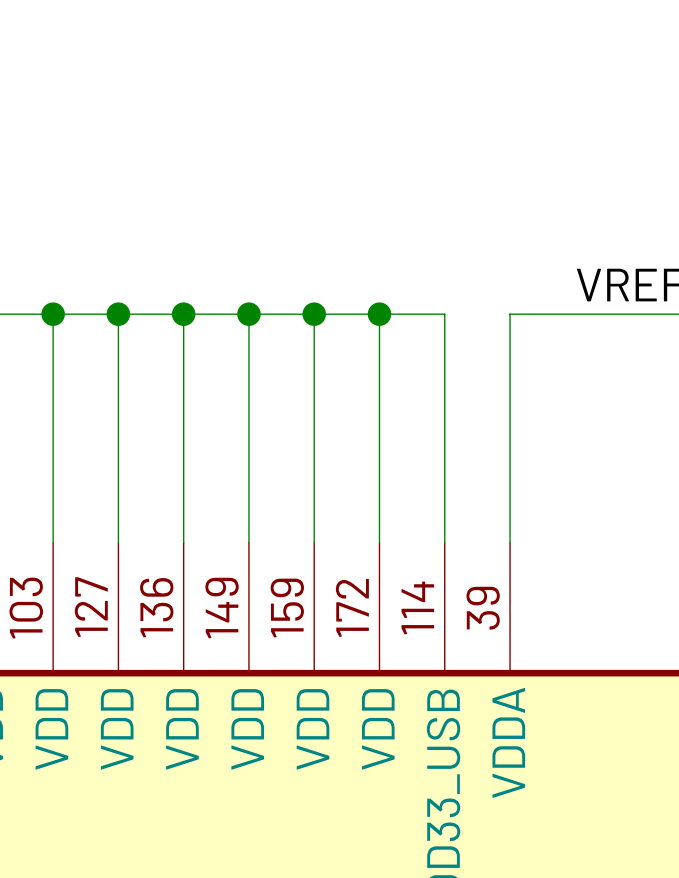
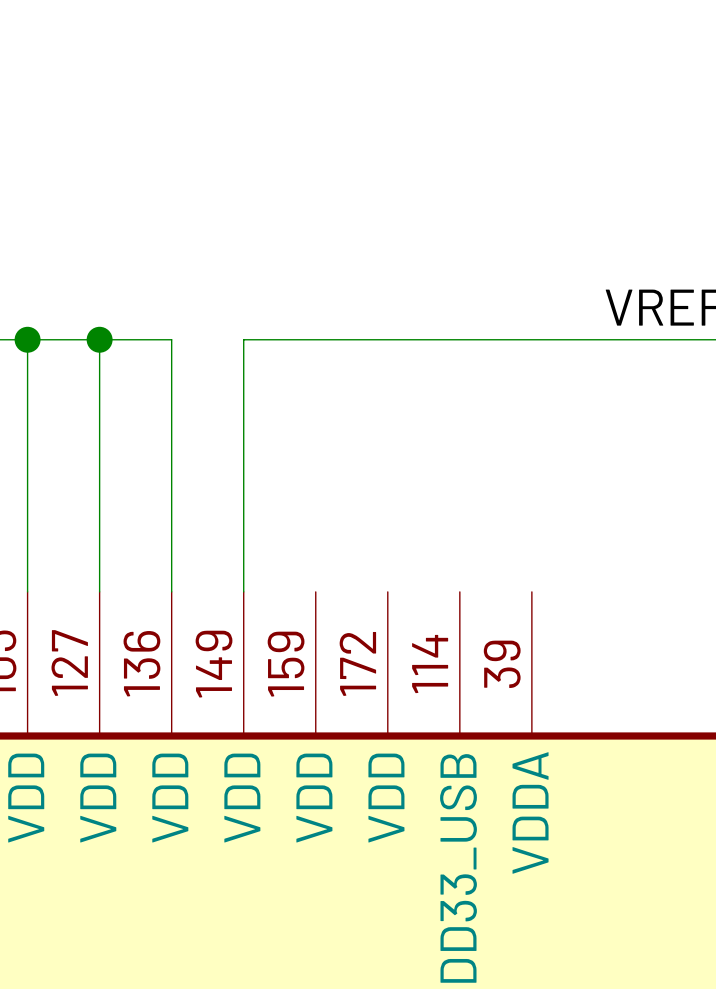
wire: (183, 314) (248, 314) -> none
junction: (183, 314) -> none
junction: (248, 314) -> none
wire: (314, 314) (314, 542) -> none
junction: (314, 314) -> none
wire: (379, 314) (379, 542) -> none
junction: (379, 314) -> none
wire: (444, 314) (444, 542) -> (459, 339) (531, 339)
wire: (510, 314) (510, 542) -> none

